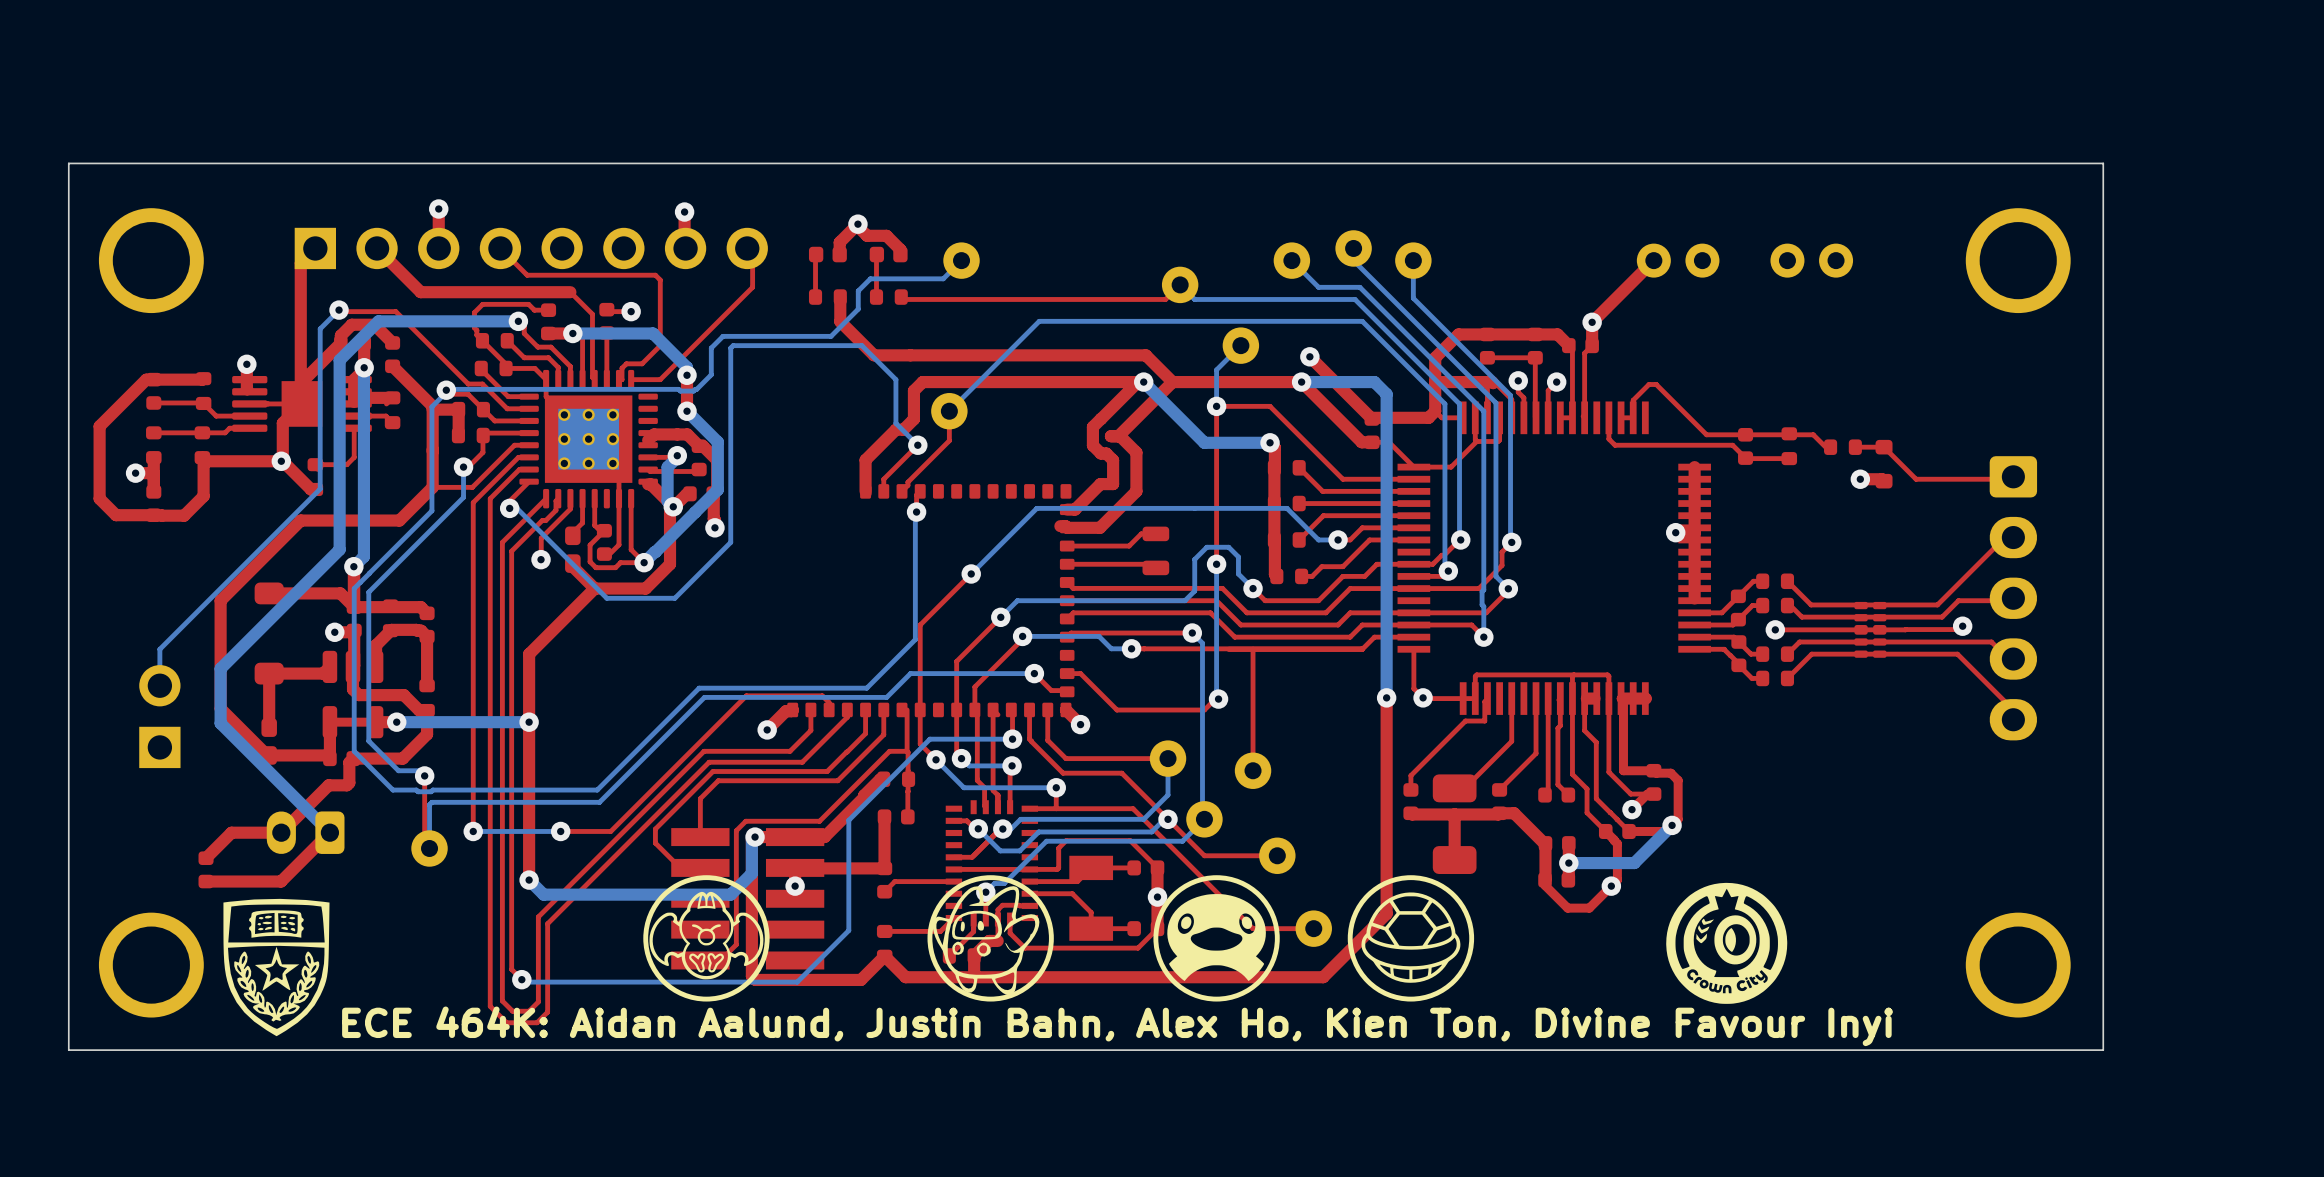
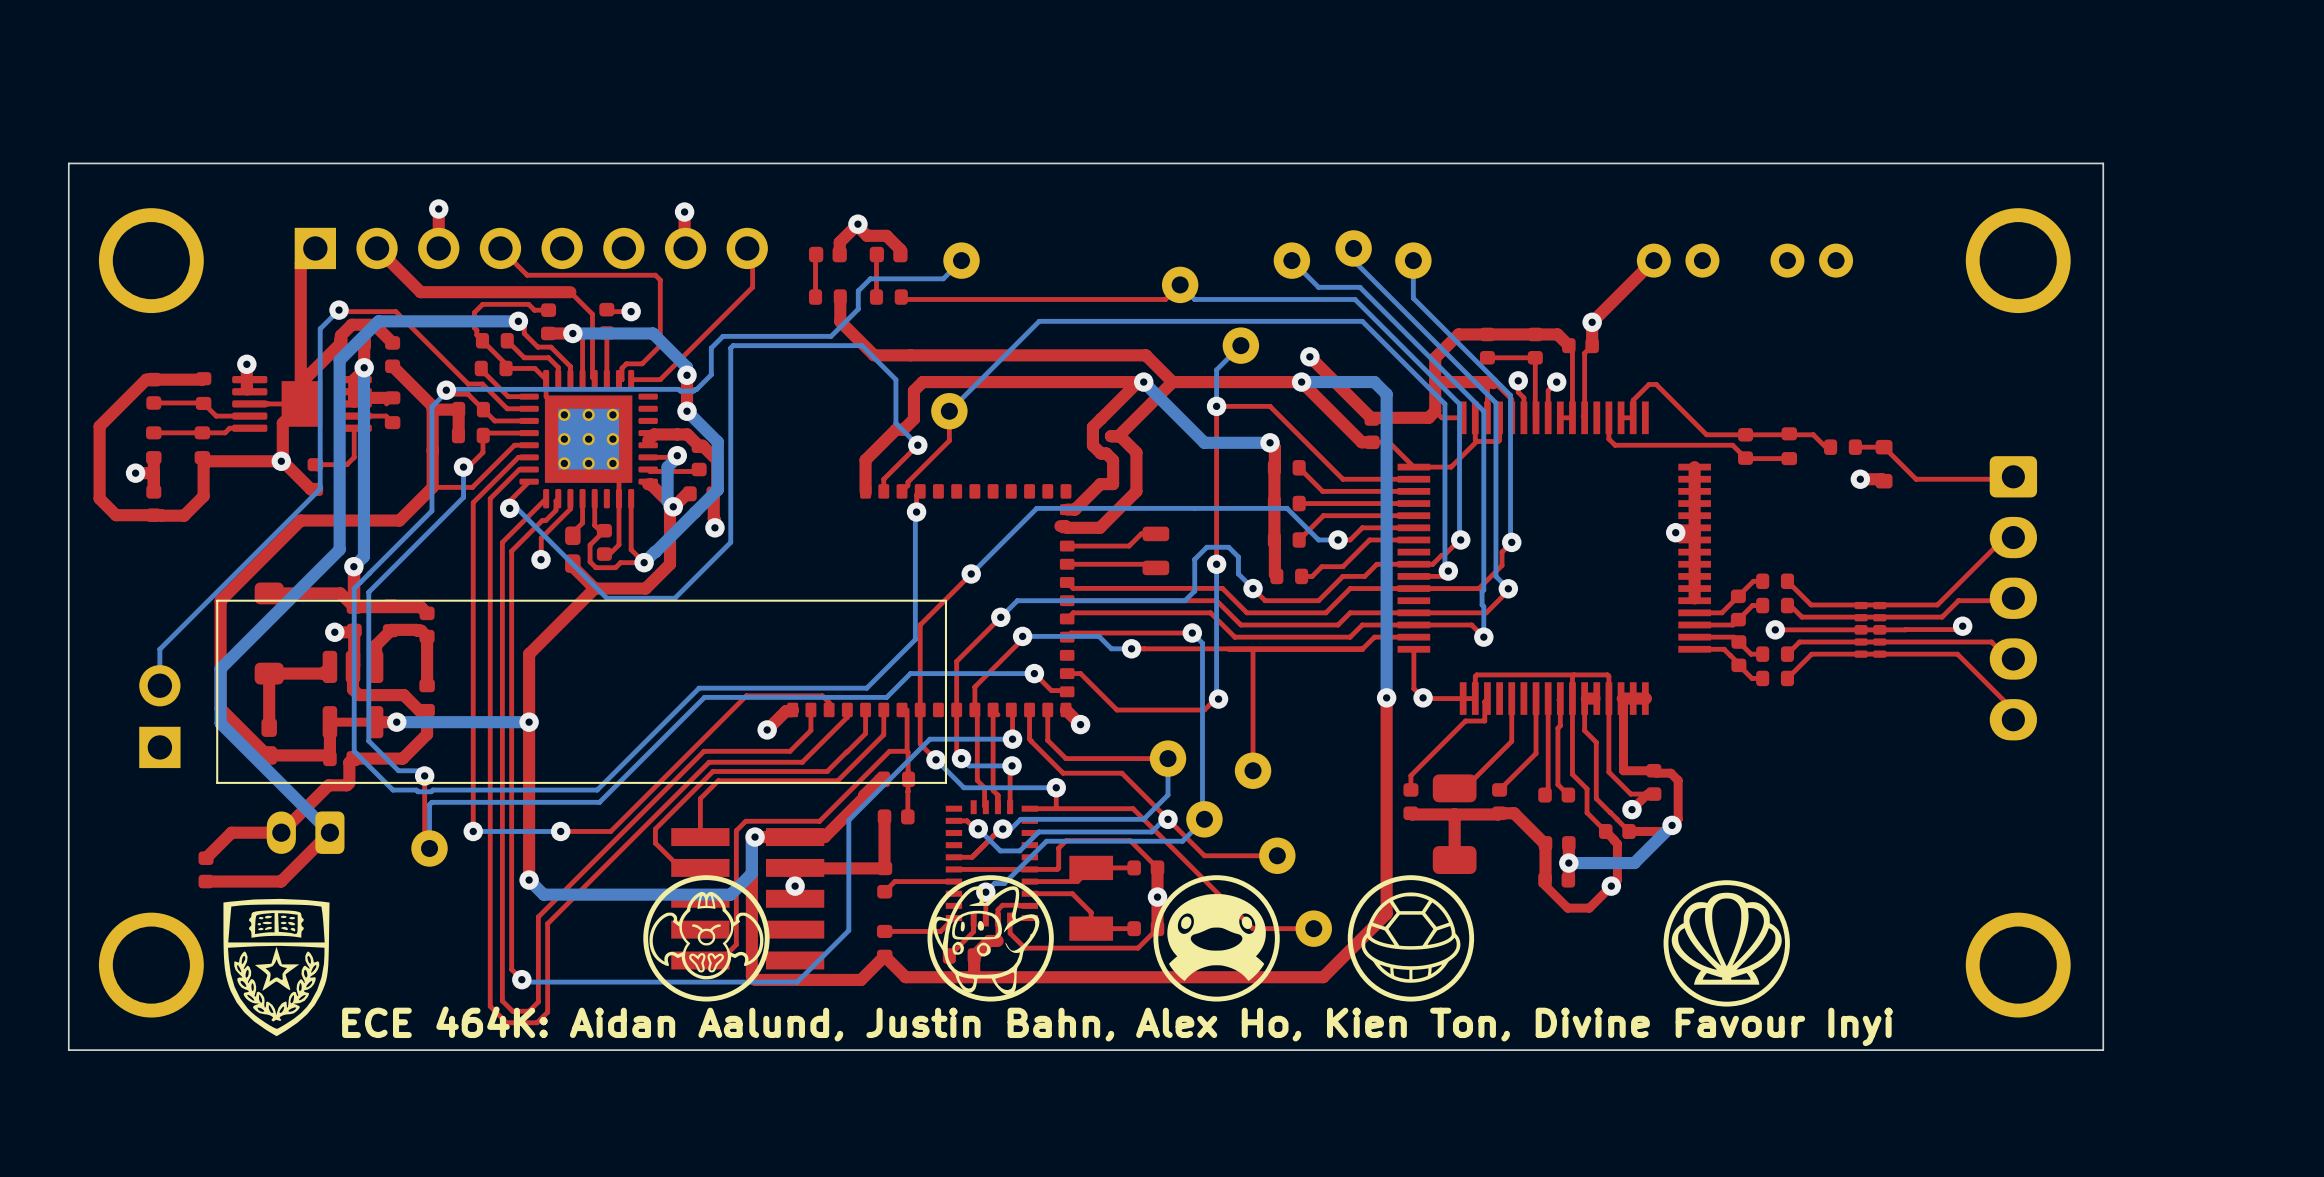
line: none -> (945, 600) (217, 600) (217, 782) (945, 782) (945, 600)
drawing shape: [1666, 882, 1788, 1004] -> [1663, 880, 1790, 1007]
drawing: none -> [1671, 892, 1782, 985]

